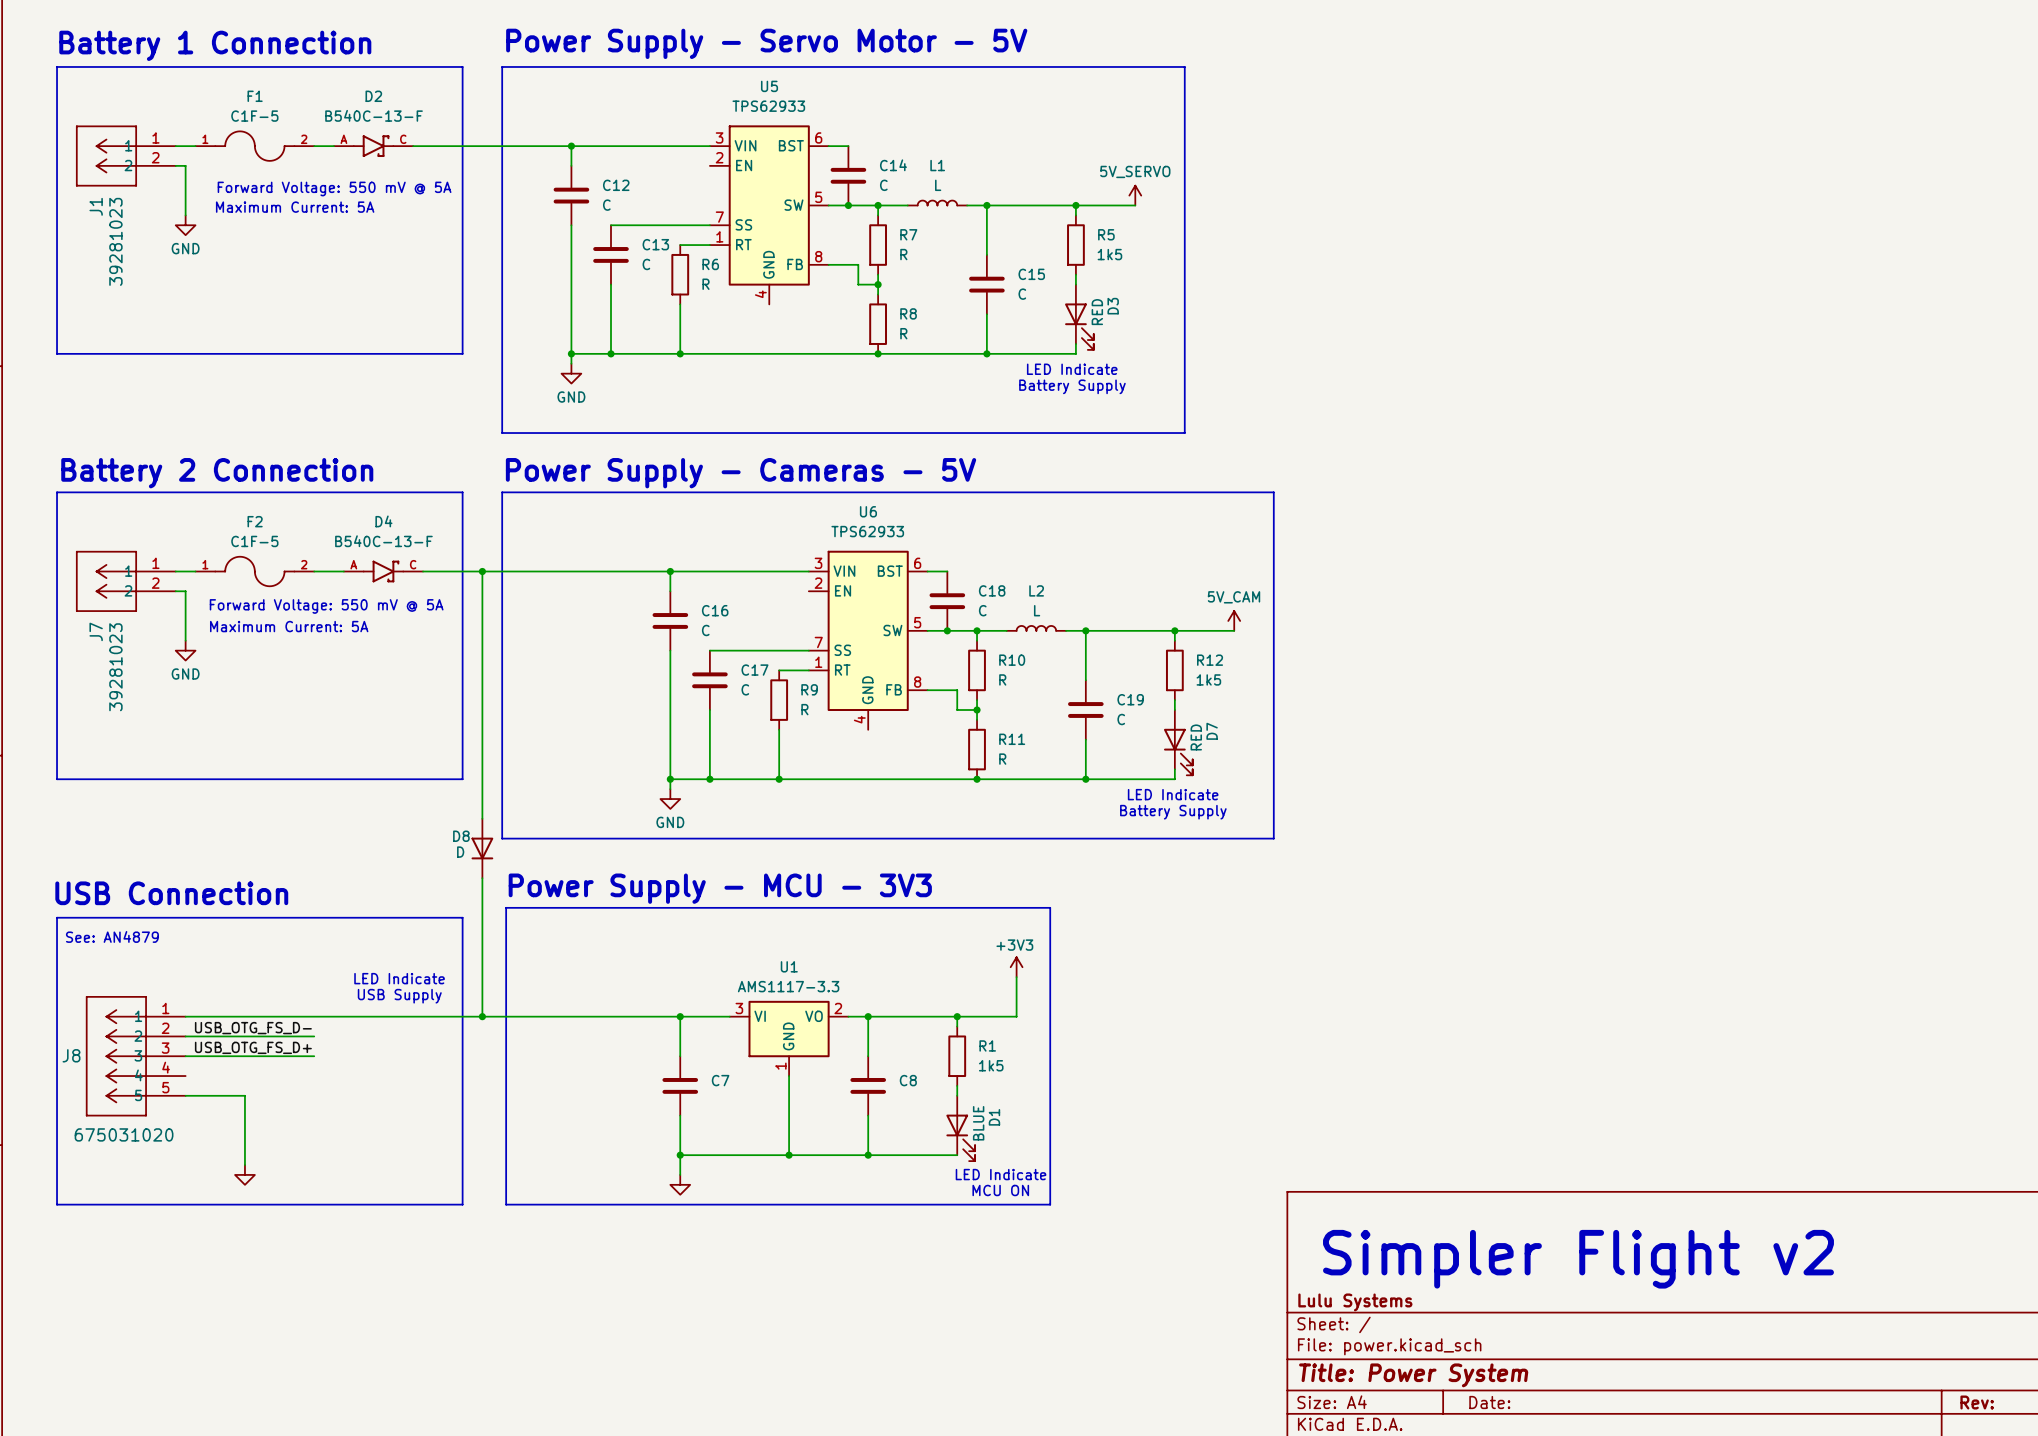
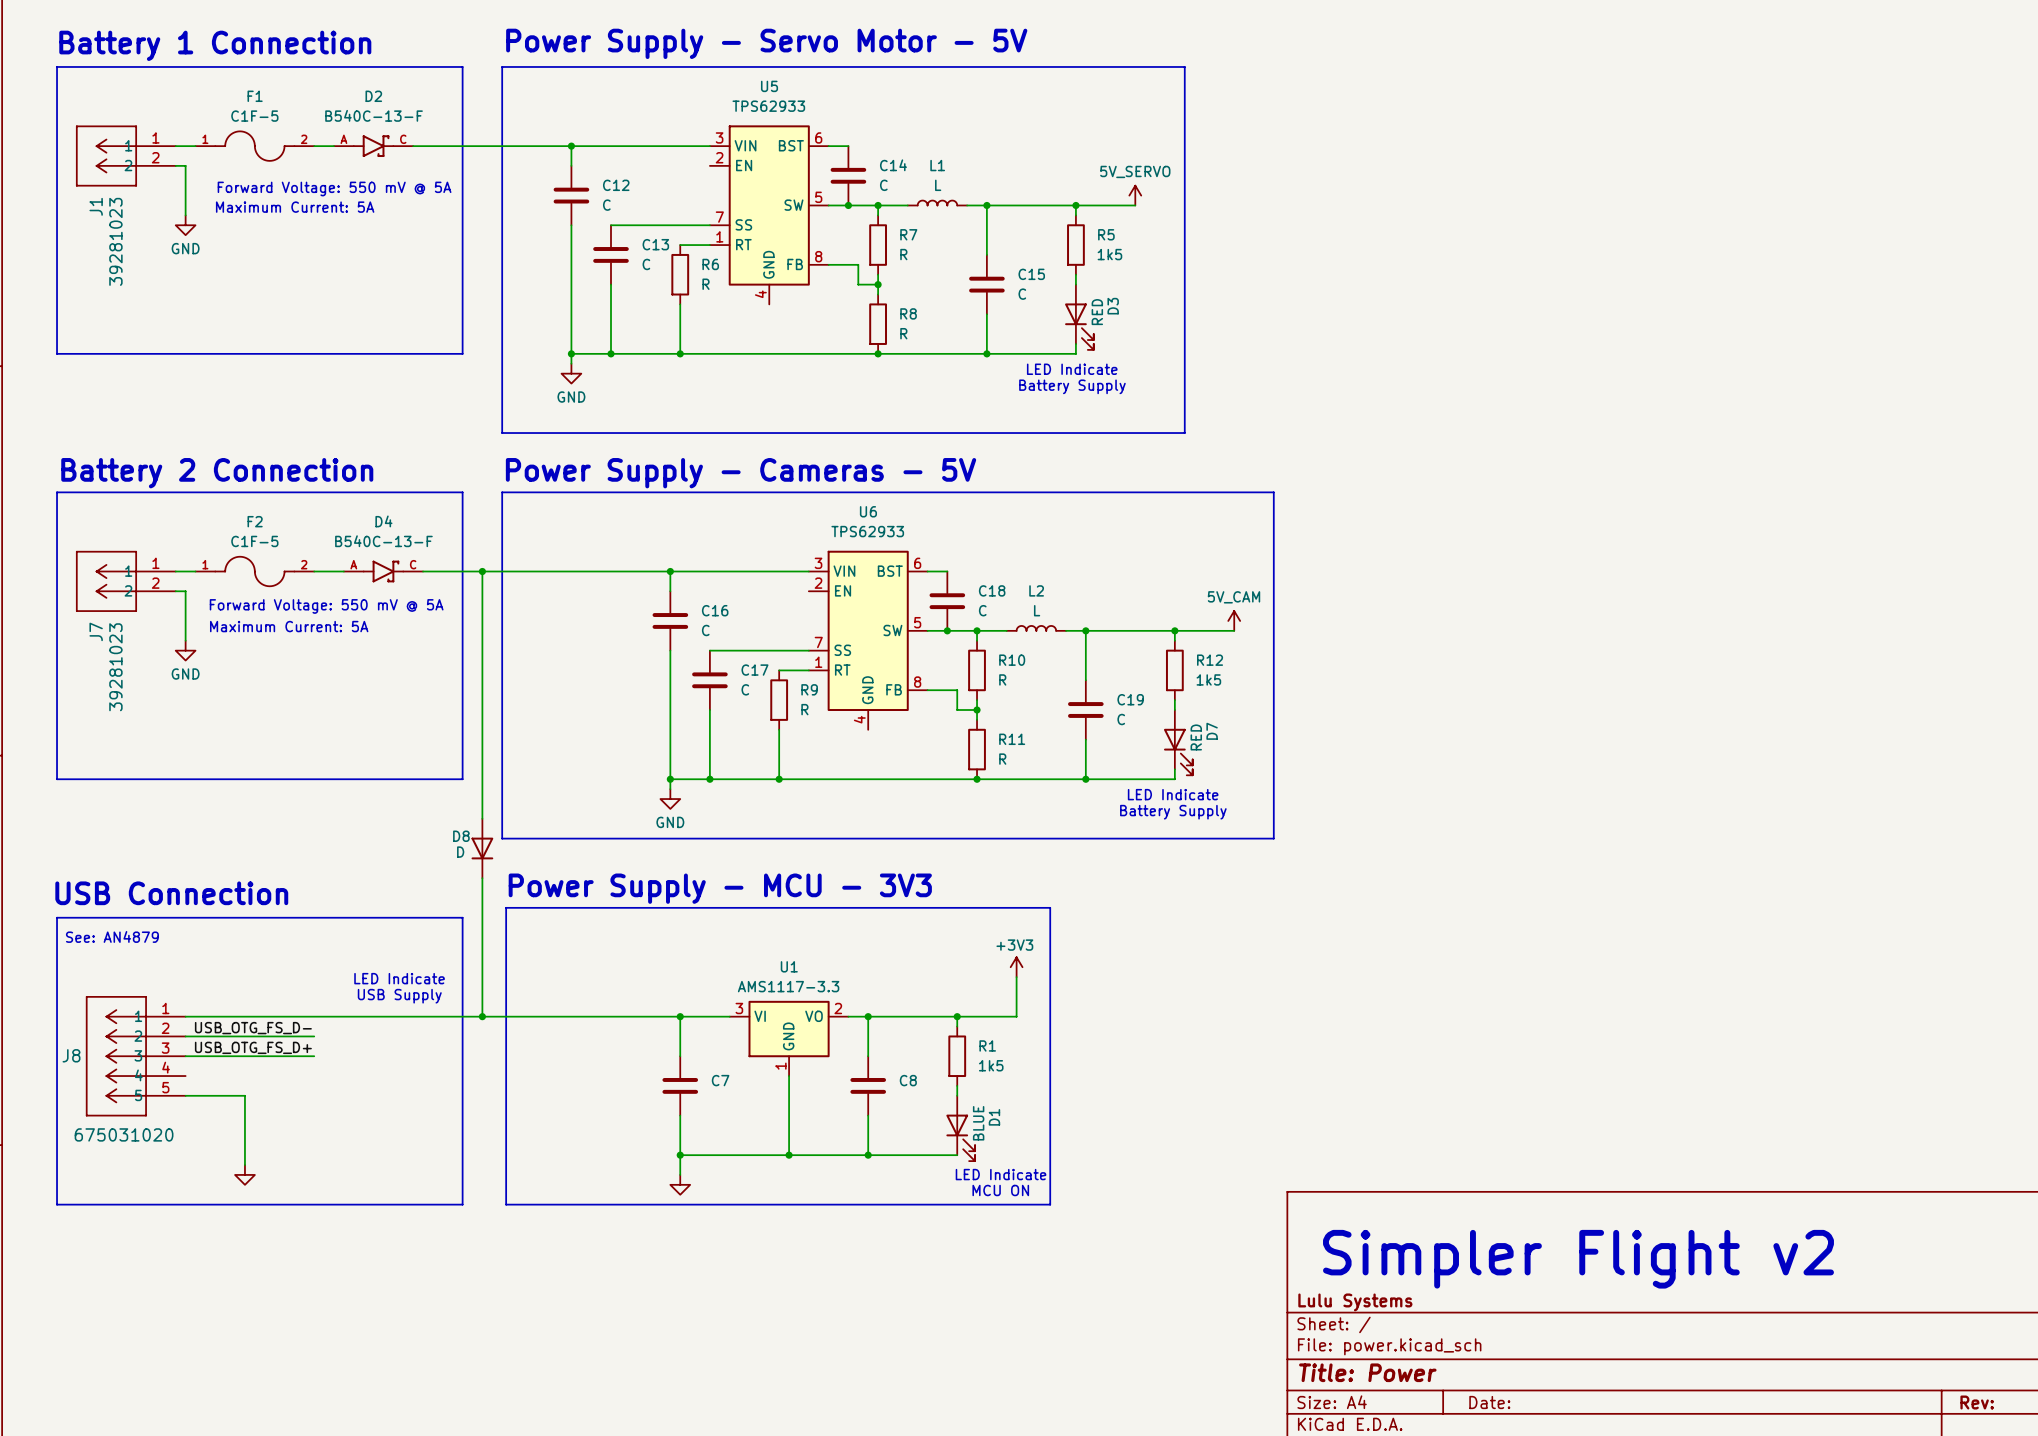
title block: Title: Power System (1413, 1375) -> Title: Power (1367, 1372)

